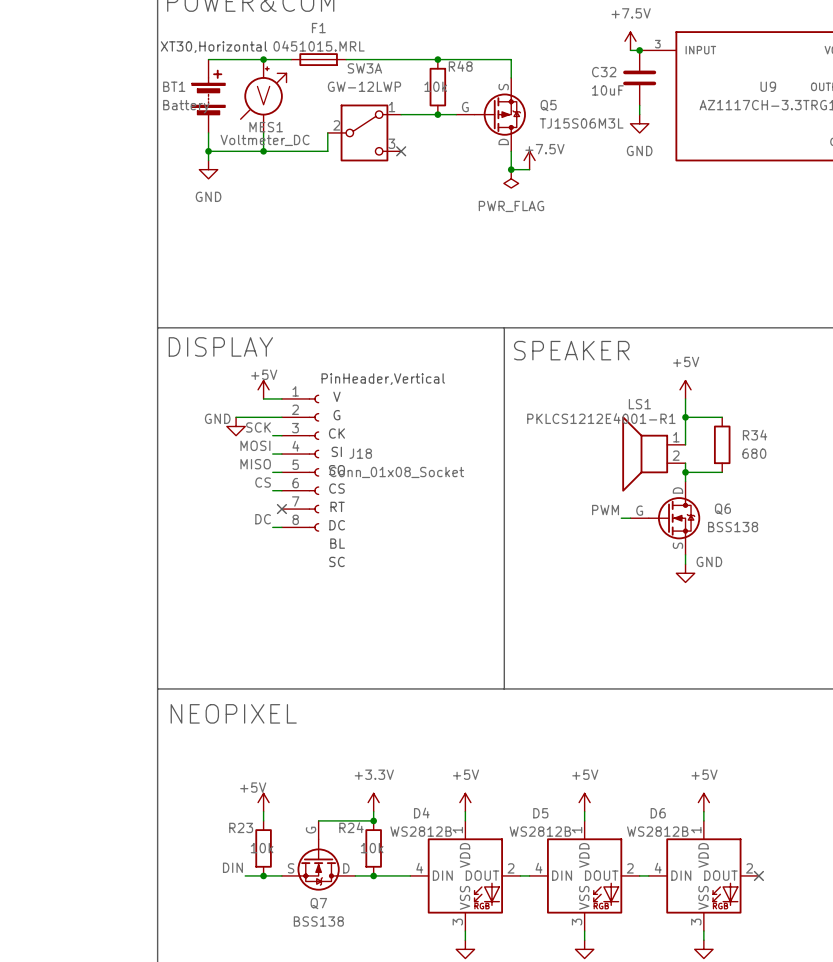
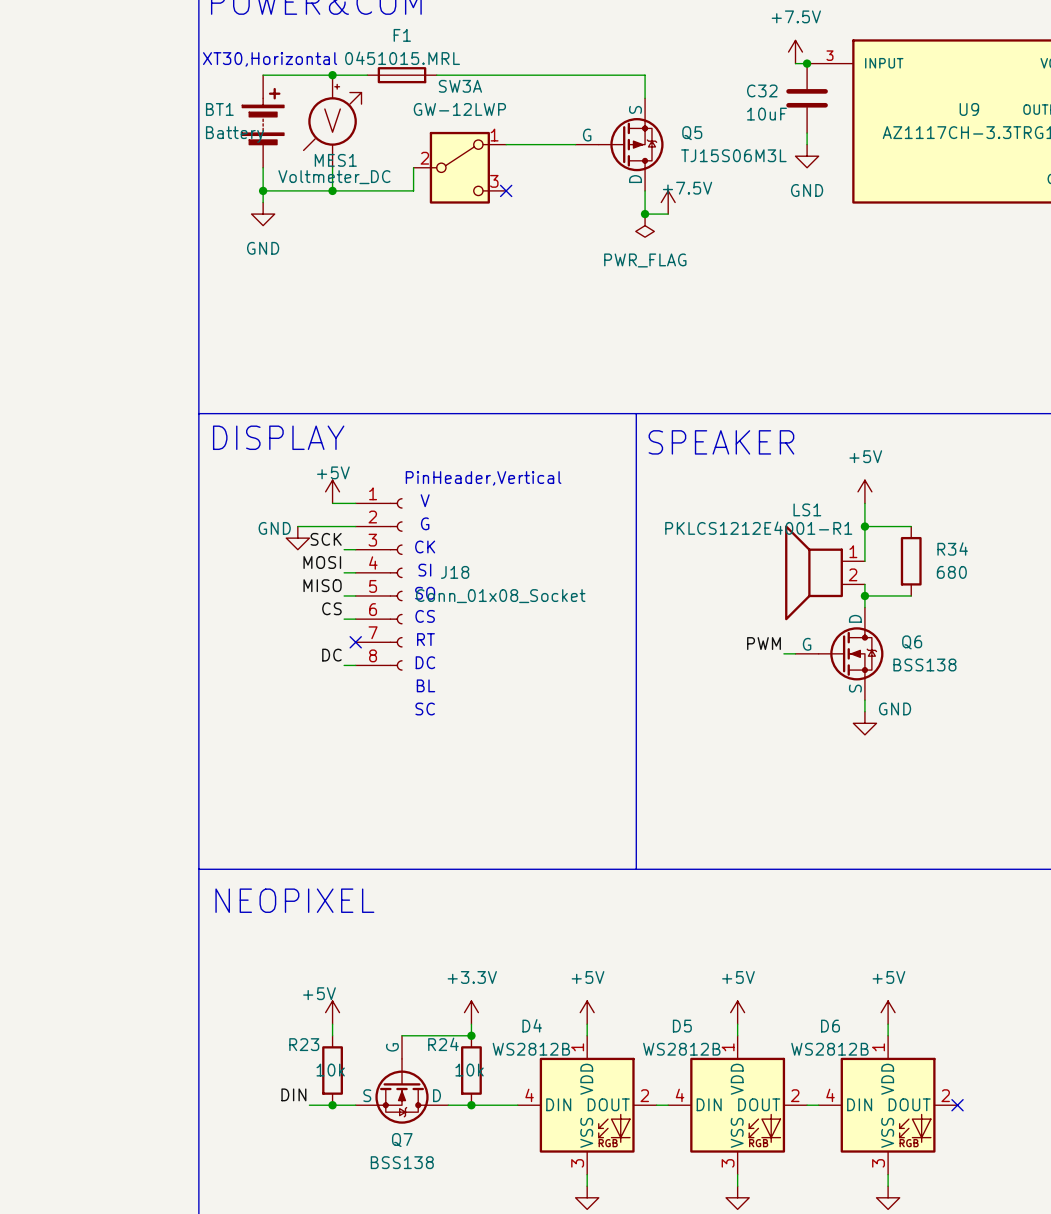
junction: (437, 59) -> none
R48: 10k (437, 87) -> none
junction: (437, 114) -> none

